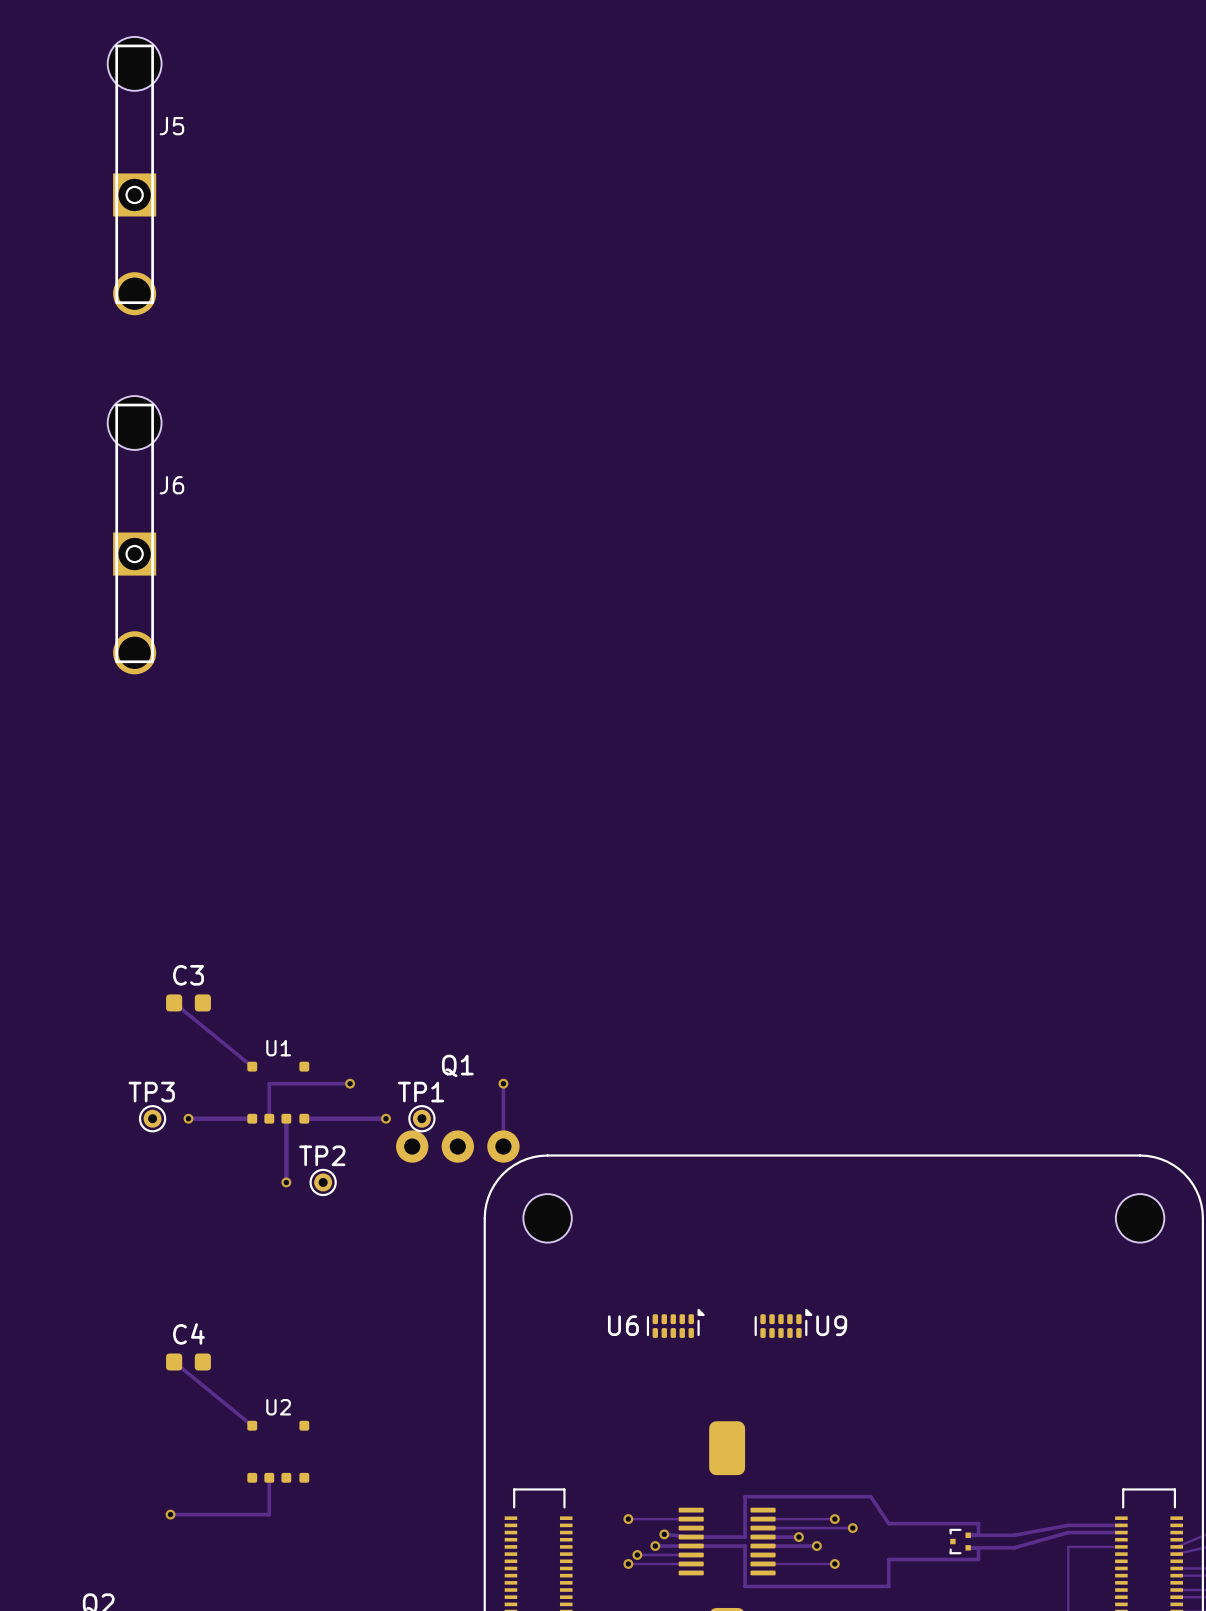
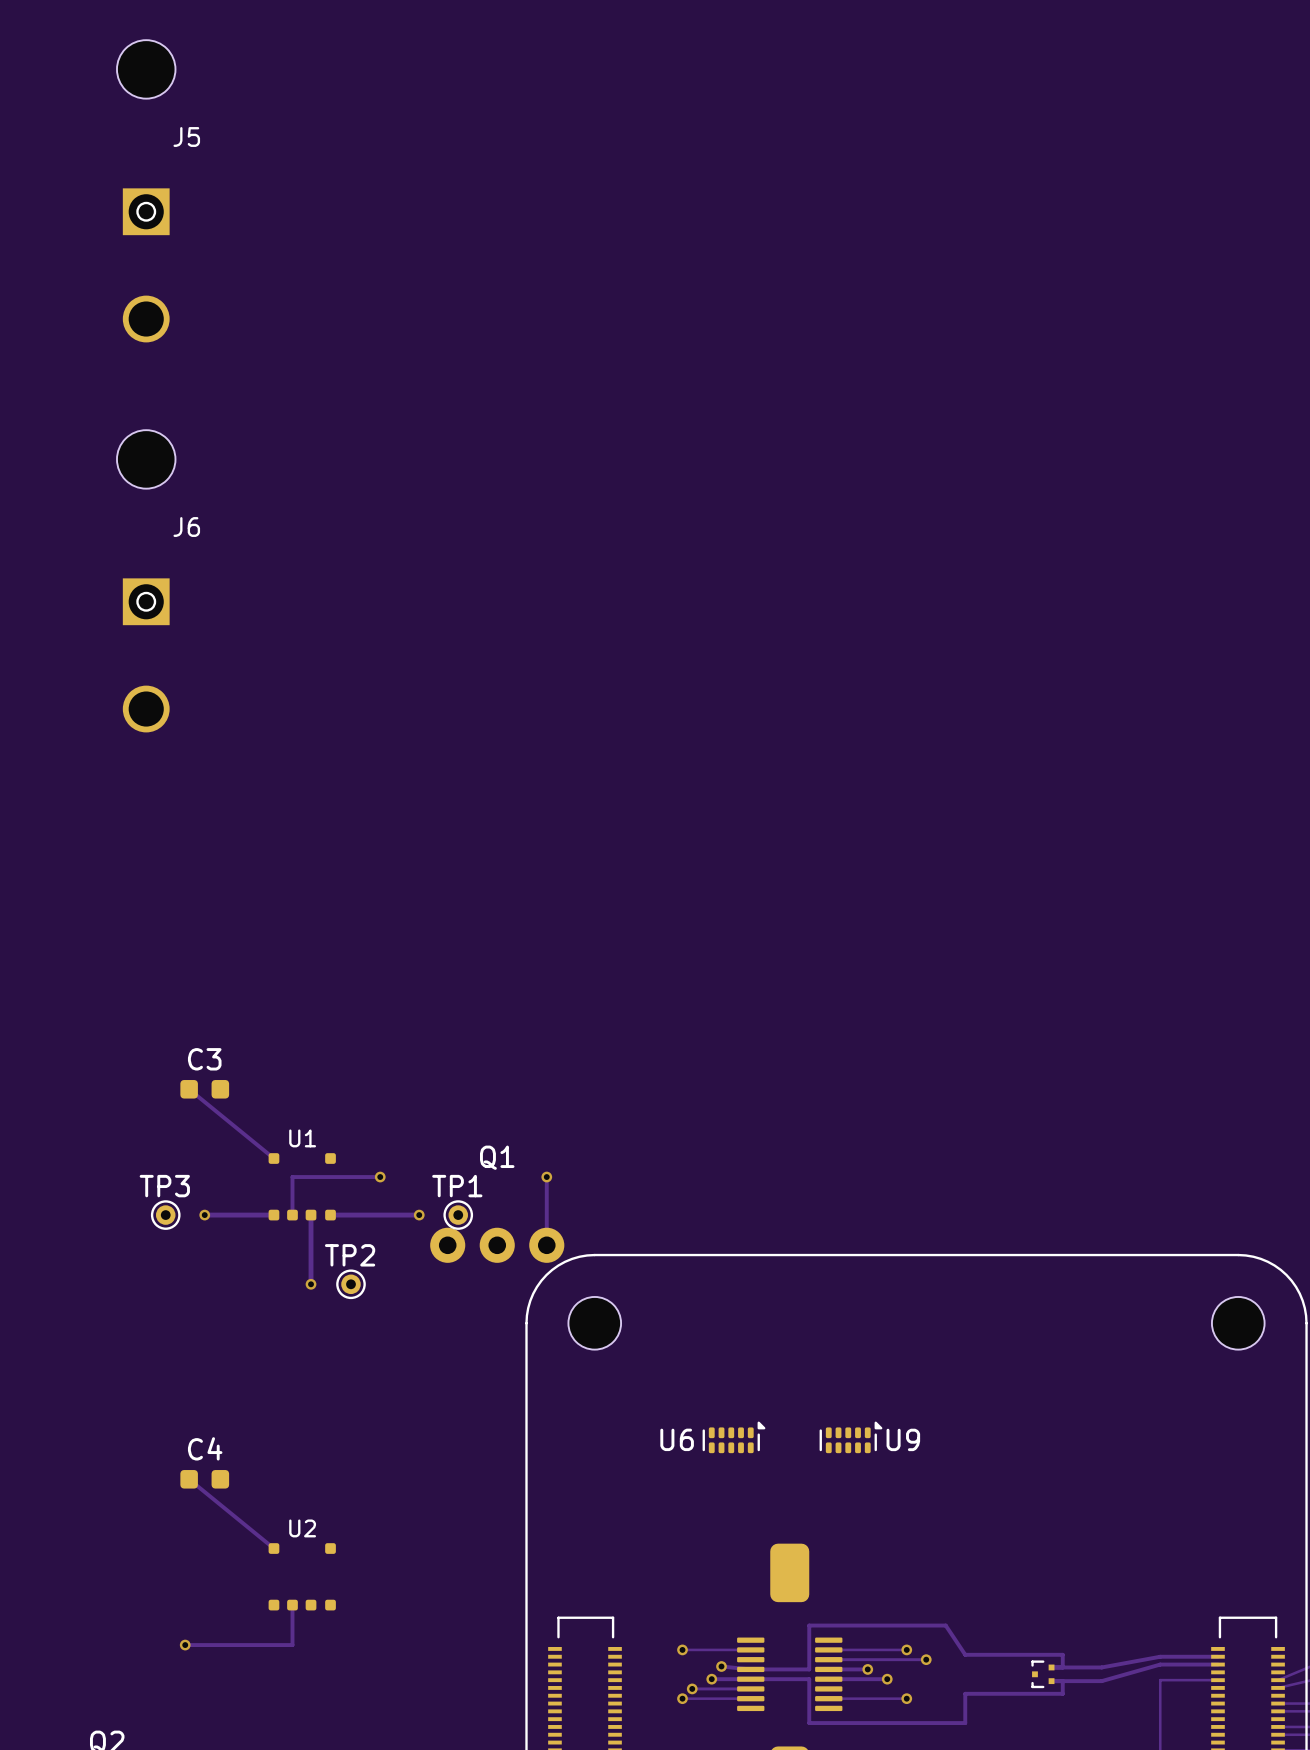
J5 footprint: [107, 36, 162, 316] -> [116, 40, 176, 343]
J6 footprint: [107, 396, 162, 675] -> [116, 430, 176, 733]

